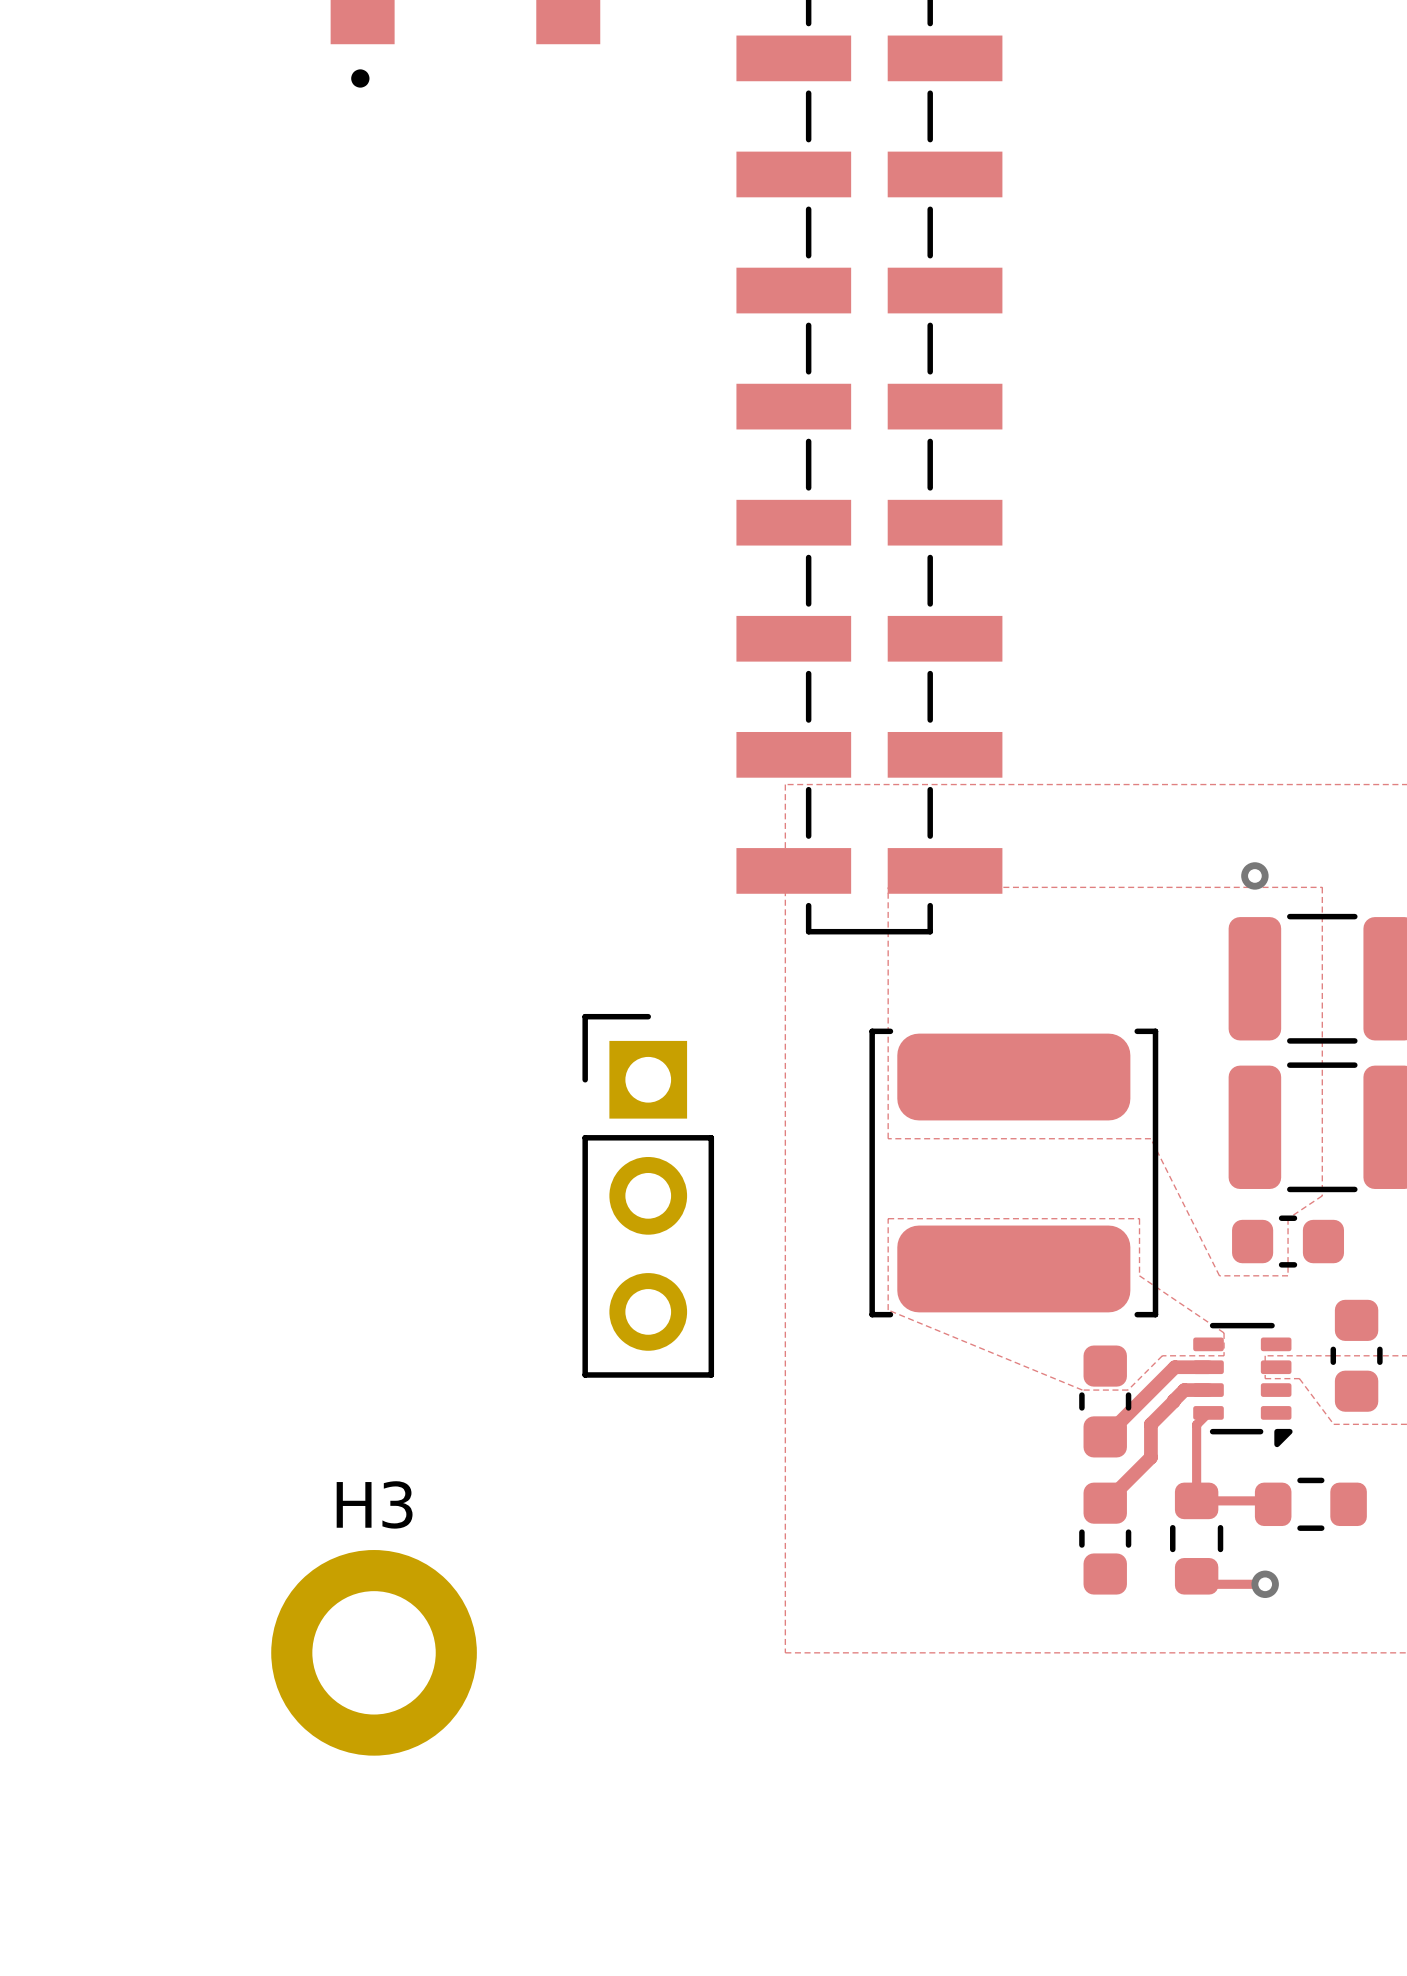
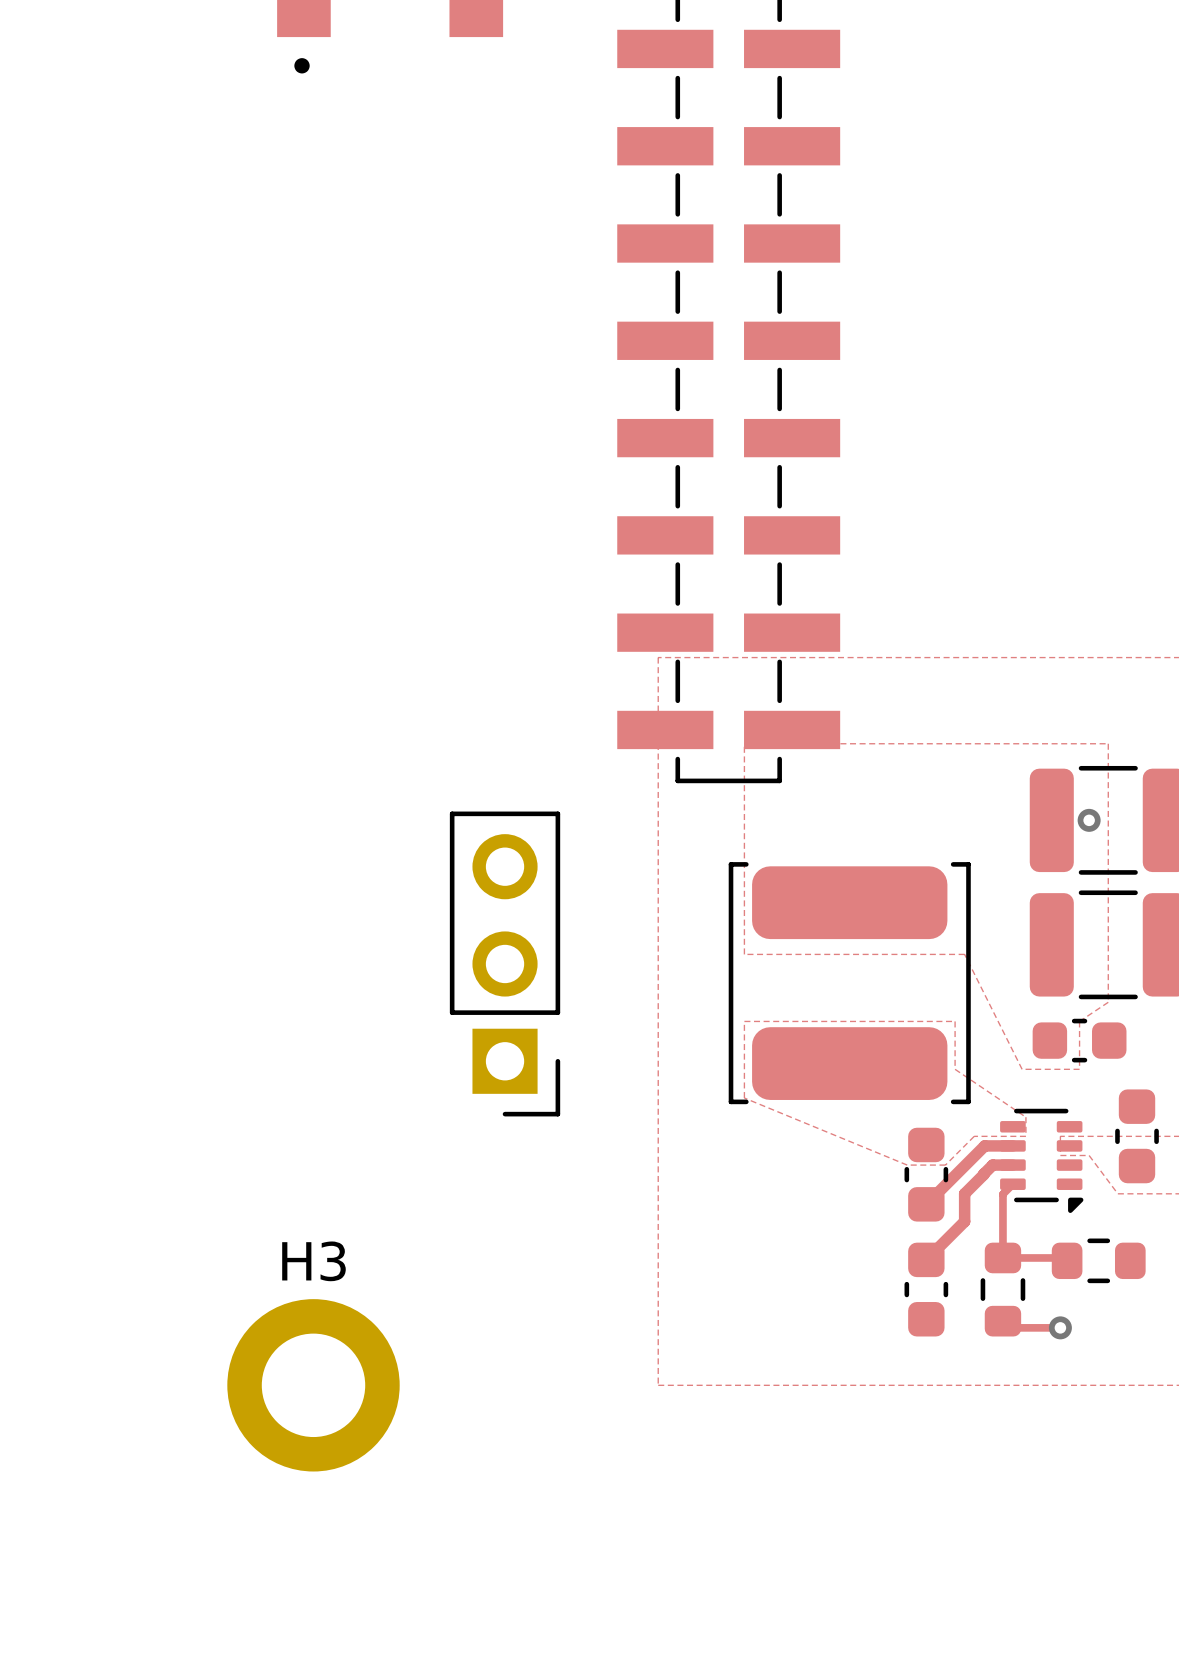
via position: (1254, 875) -> (1089, 820)
part rotation: 0° (648, 1195) -> 180° (505, 963)

